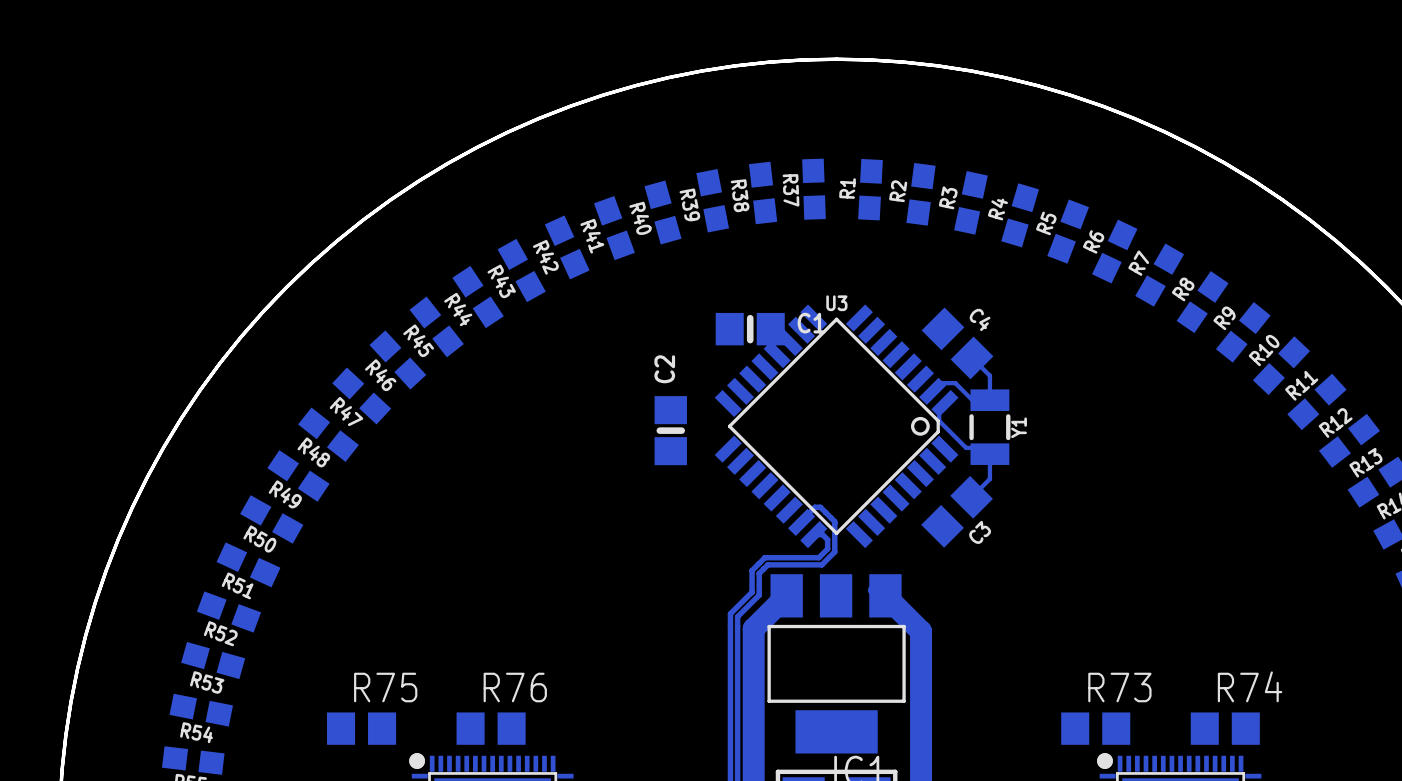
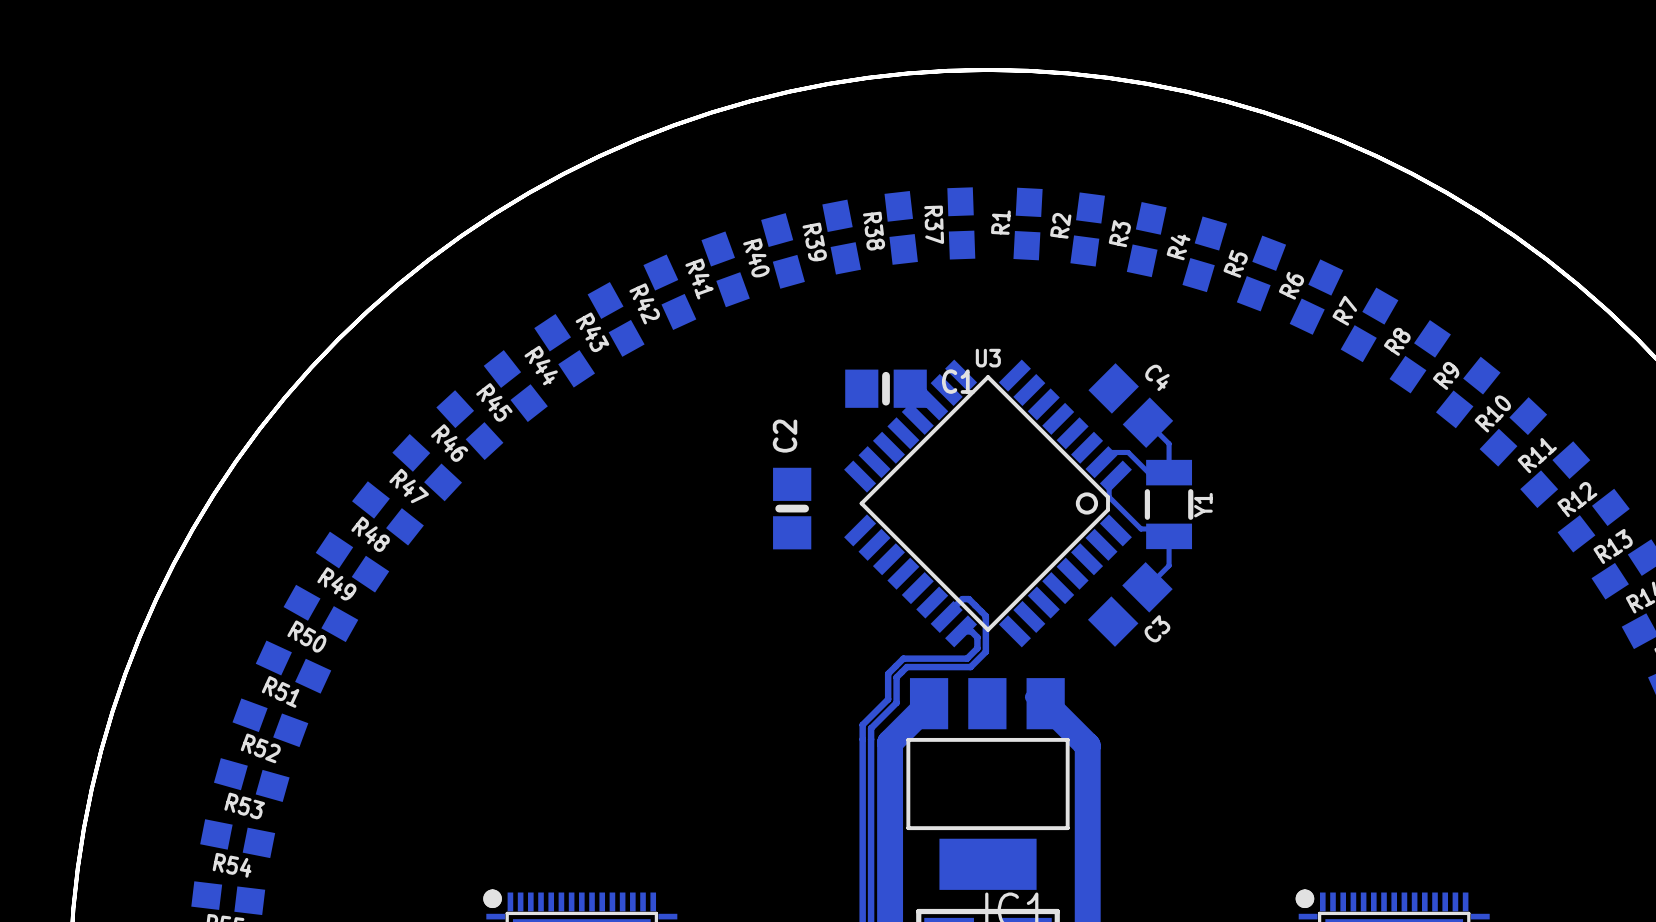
R75: (361, 728) -> none
R76: (491, 728) -> none
R73: (1095, 728) -> none
R74: (1225, 728) -> none

